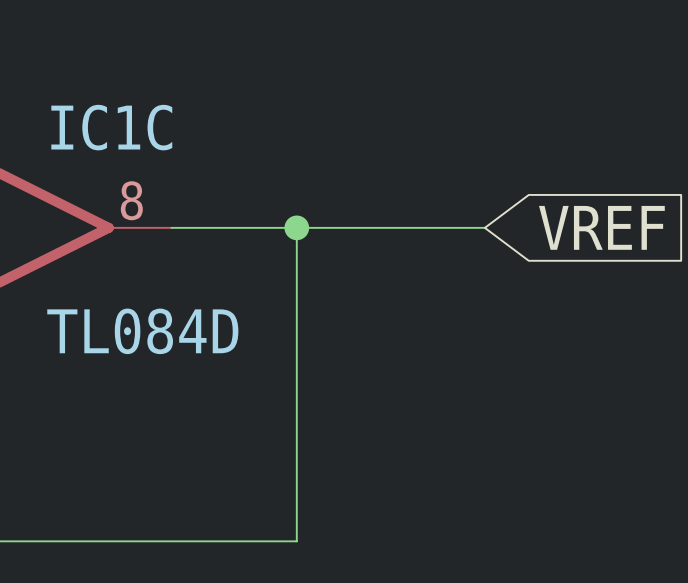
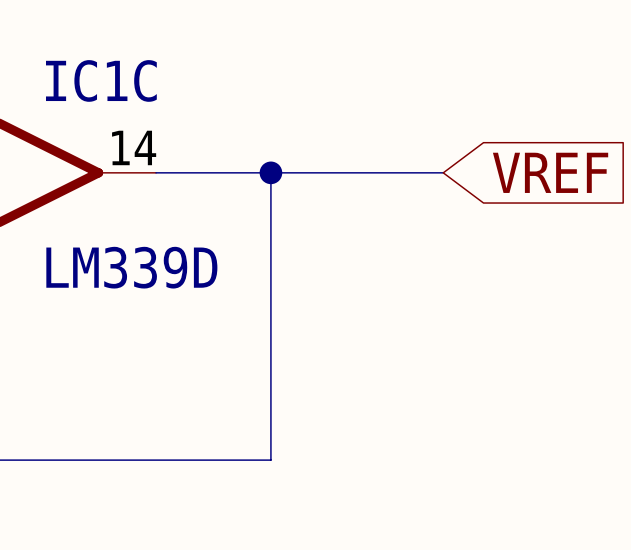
IC1C pin number: 8 (131, 200) -> 14 (134, 147)
IC1C value: TL084D (142, 331) -> LM339D (131, 267)

